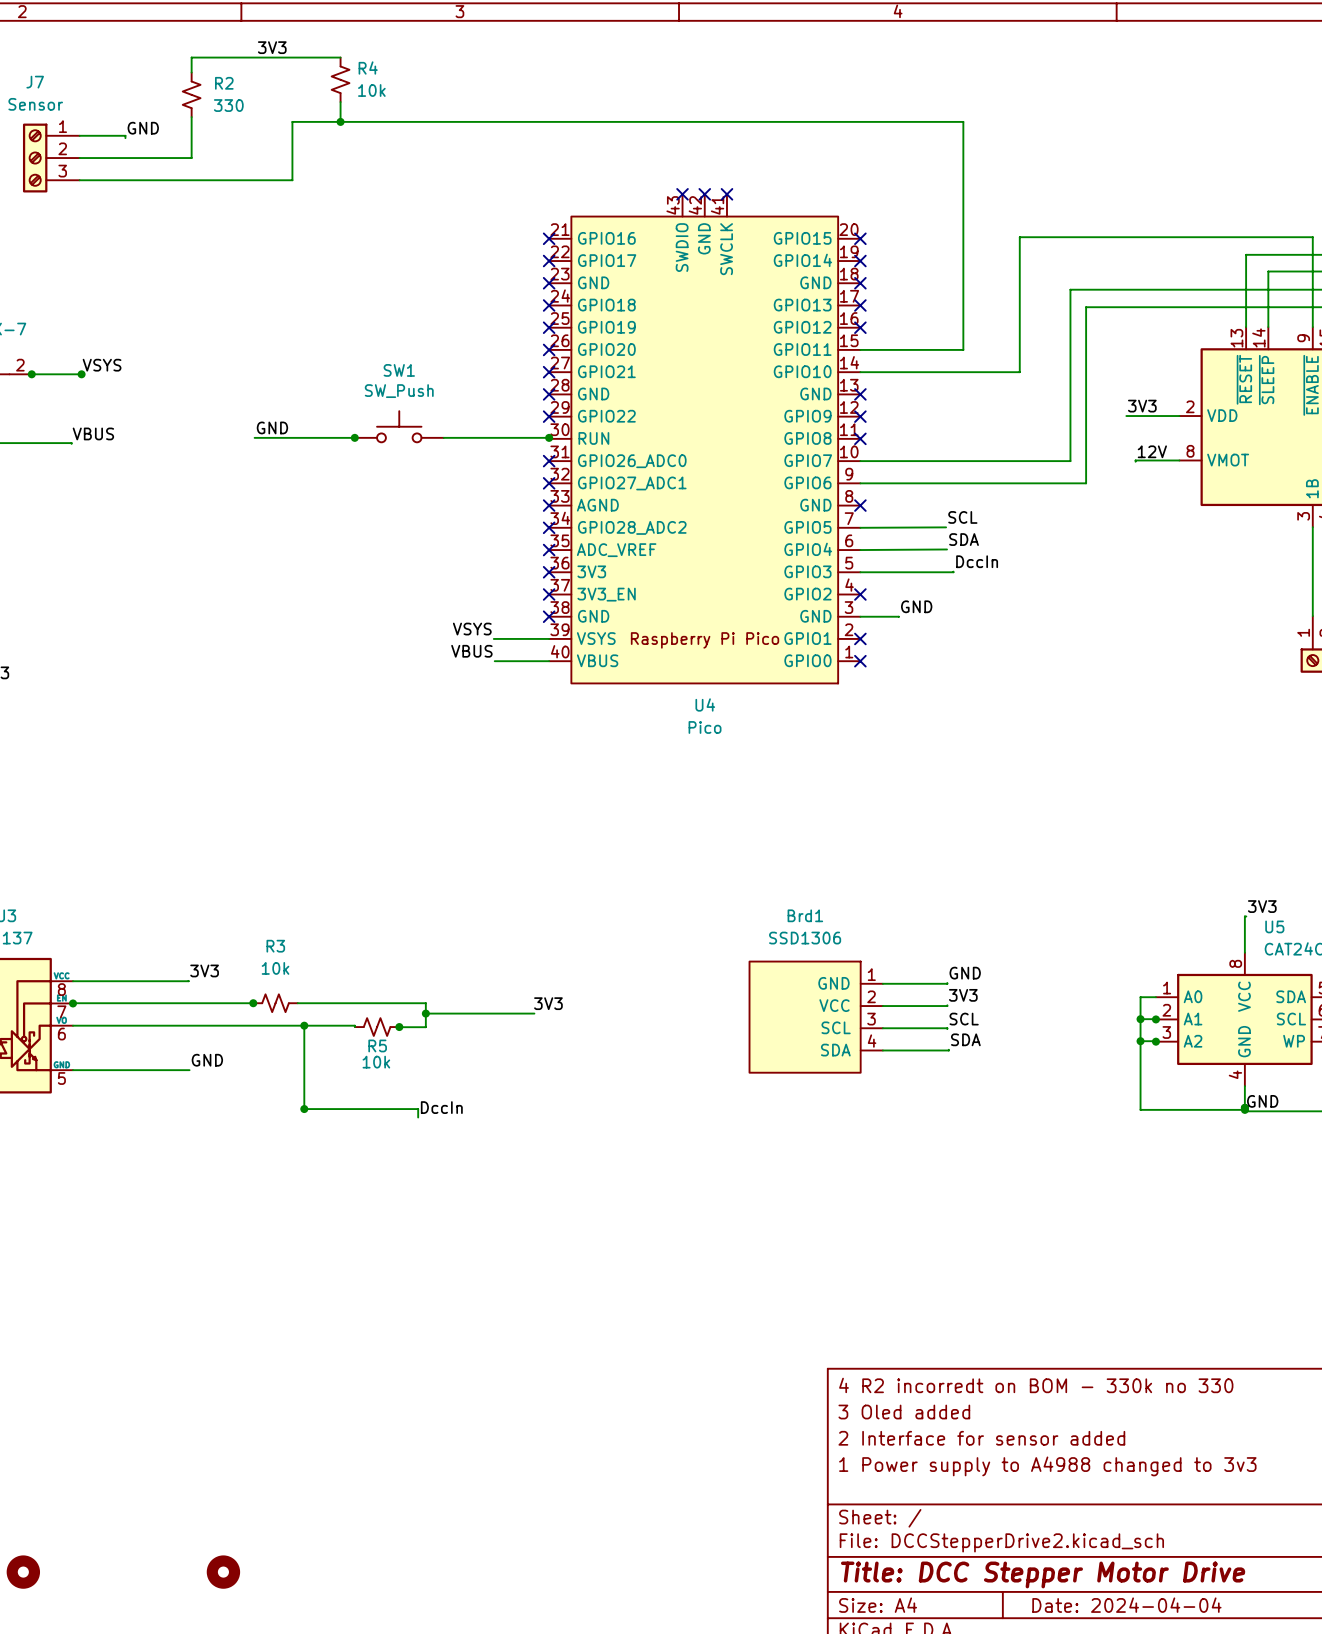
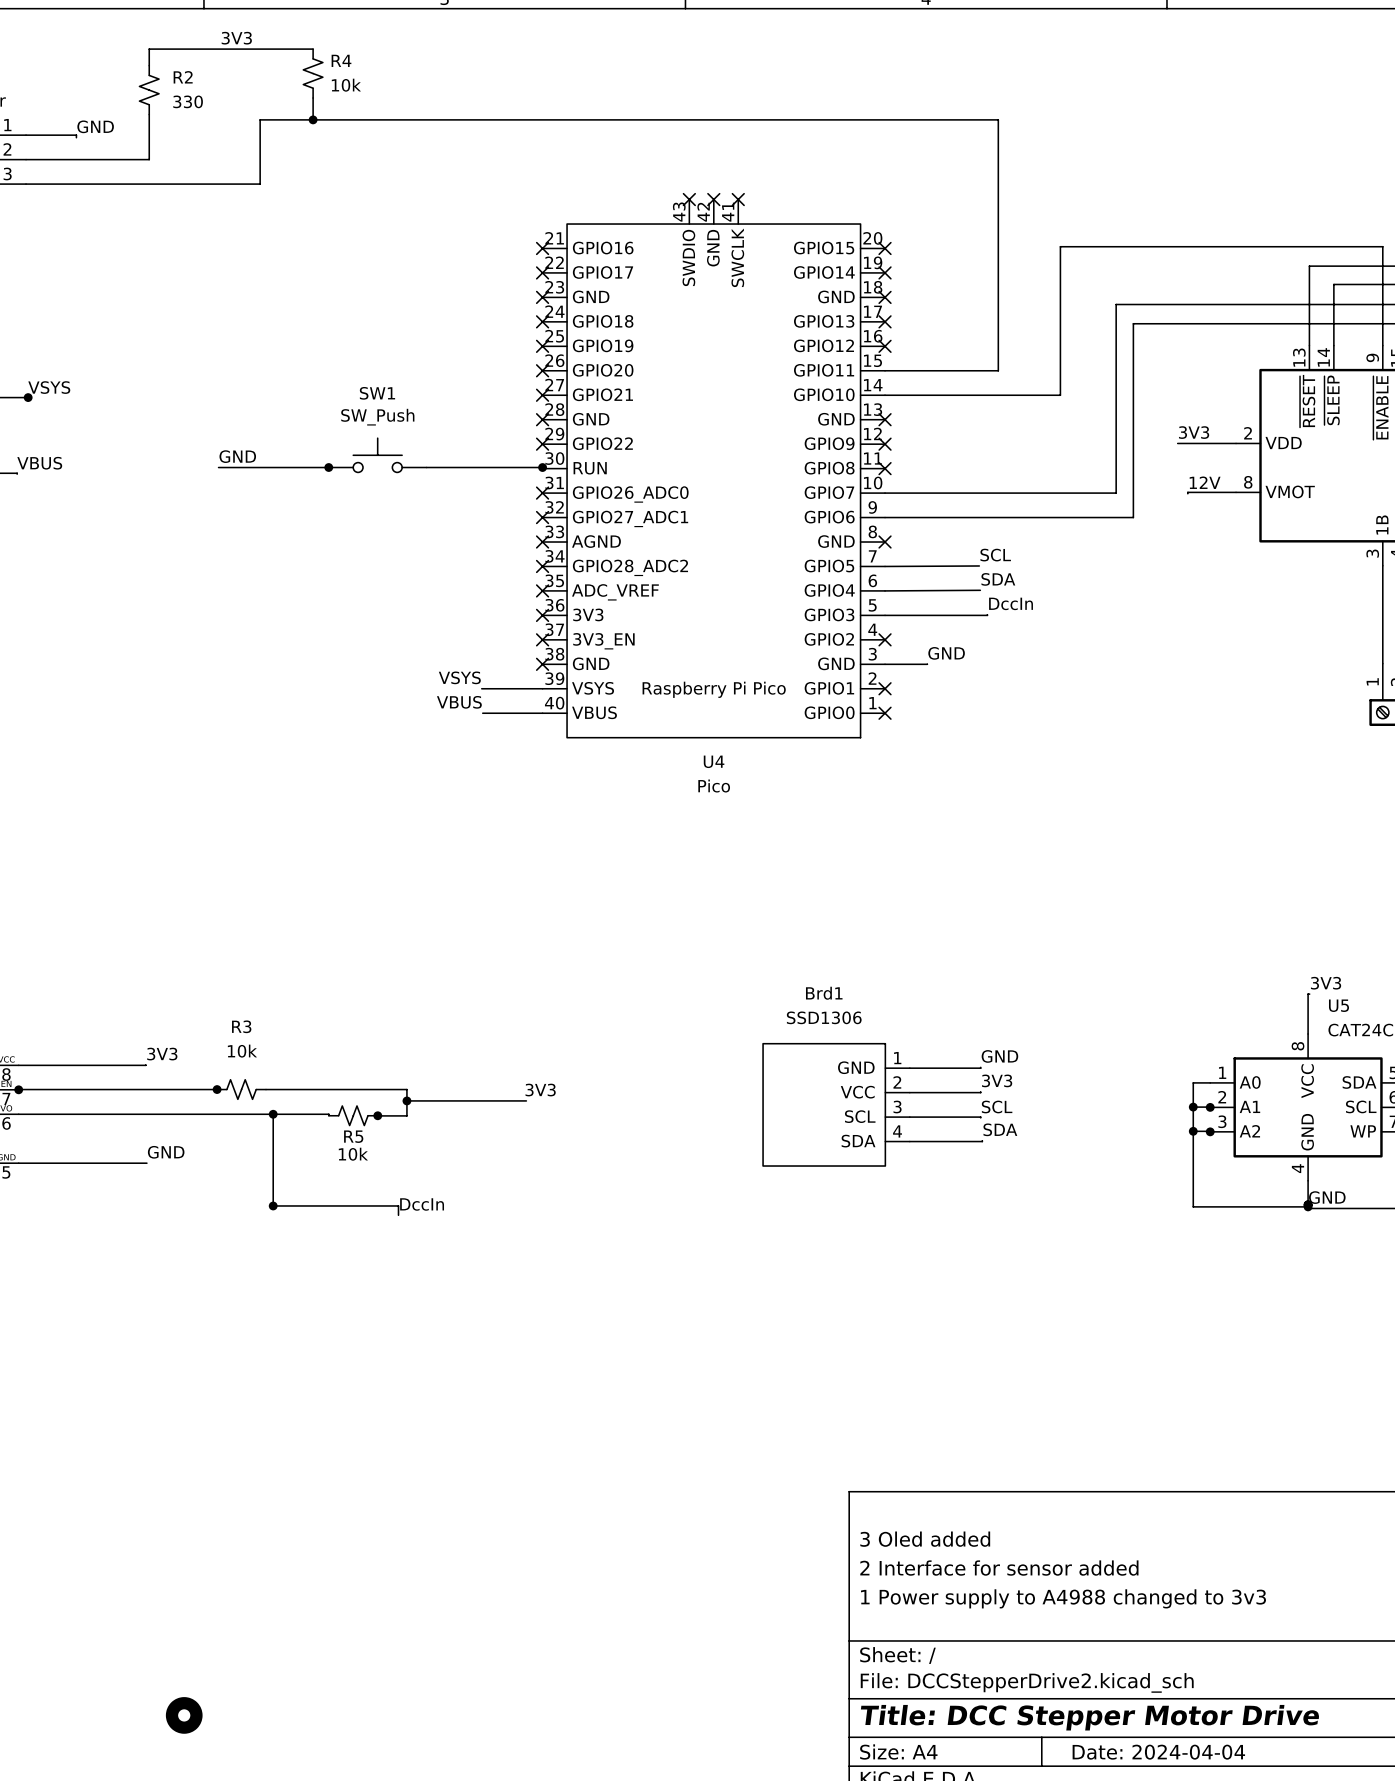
title block: 4 R2 incorredt on BOM - 330k no 330 (1036, 1385) -> none

